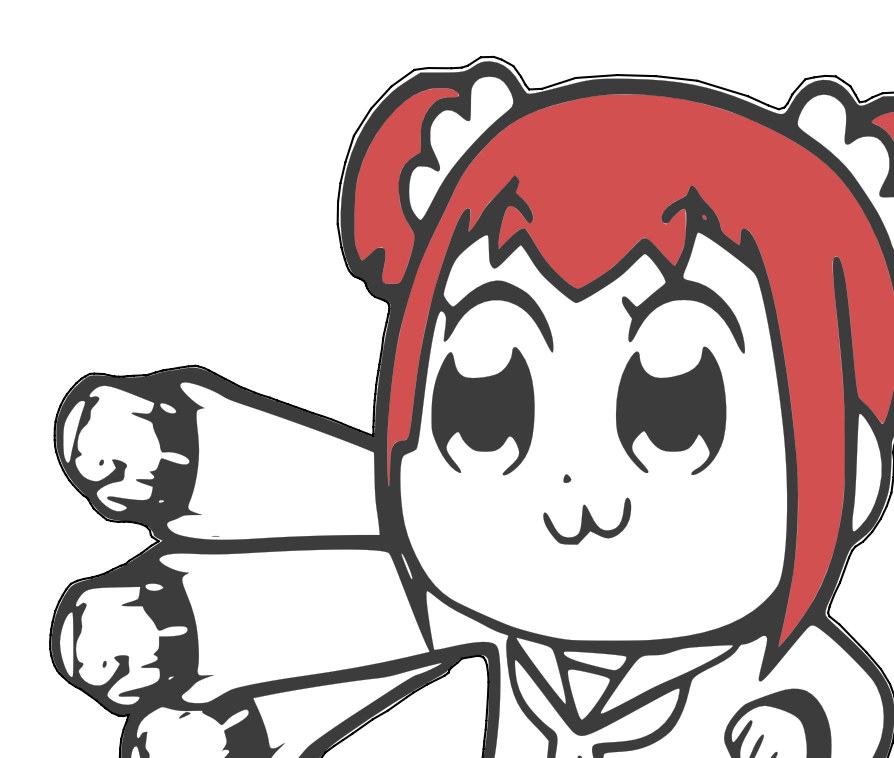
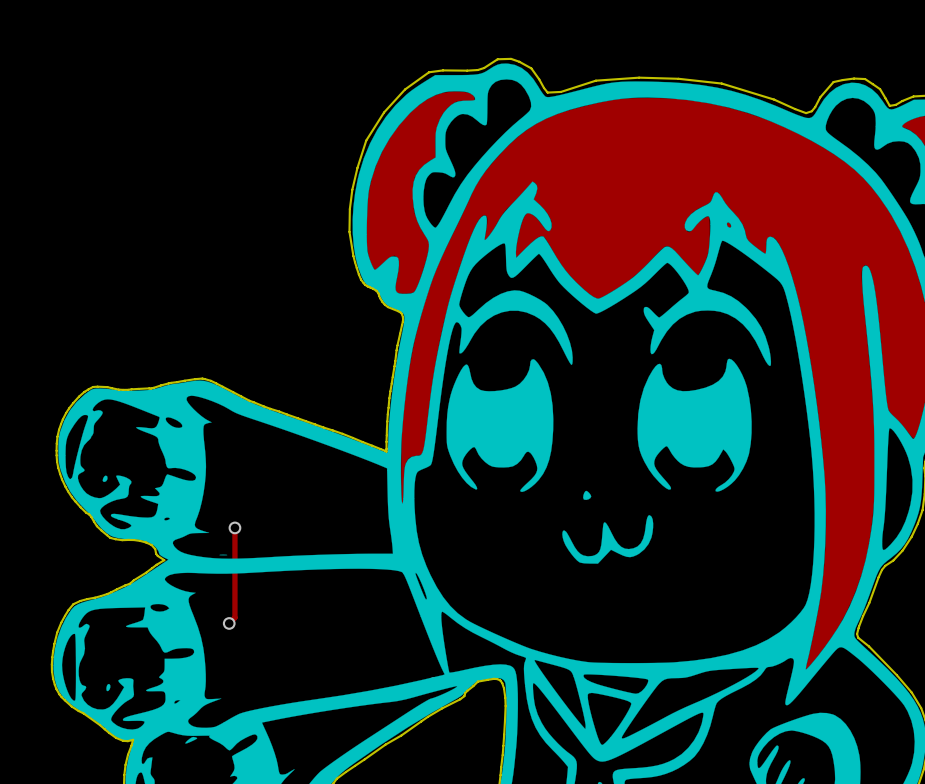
track: none -> (234, 527) (234, 617) (229, 623)
via: none -> (234, 527)
via: none -> (229, 623)

